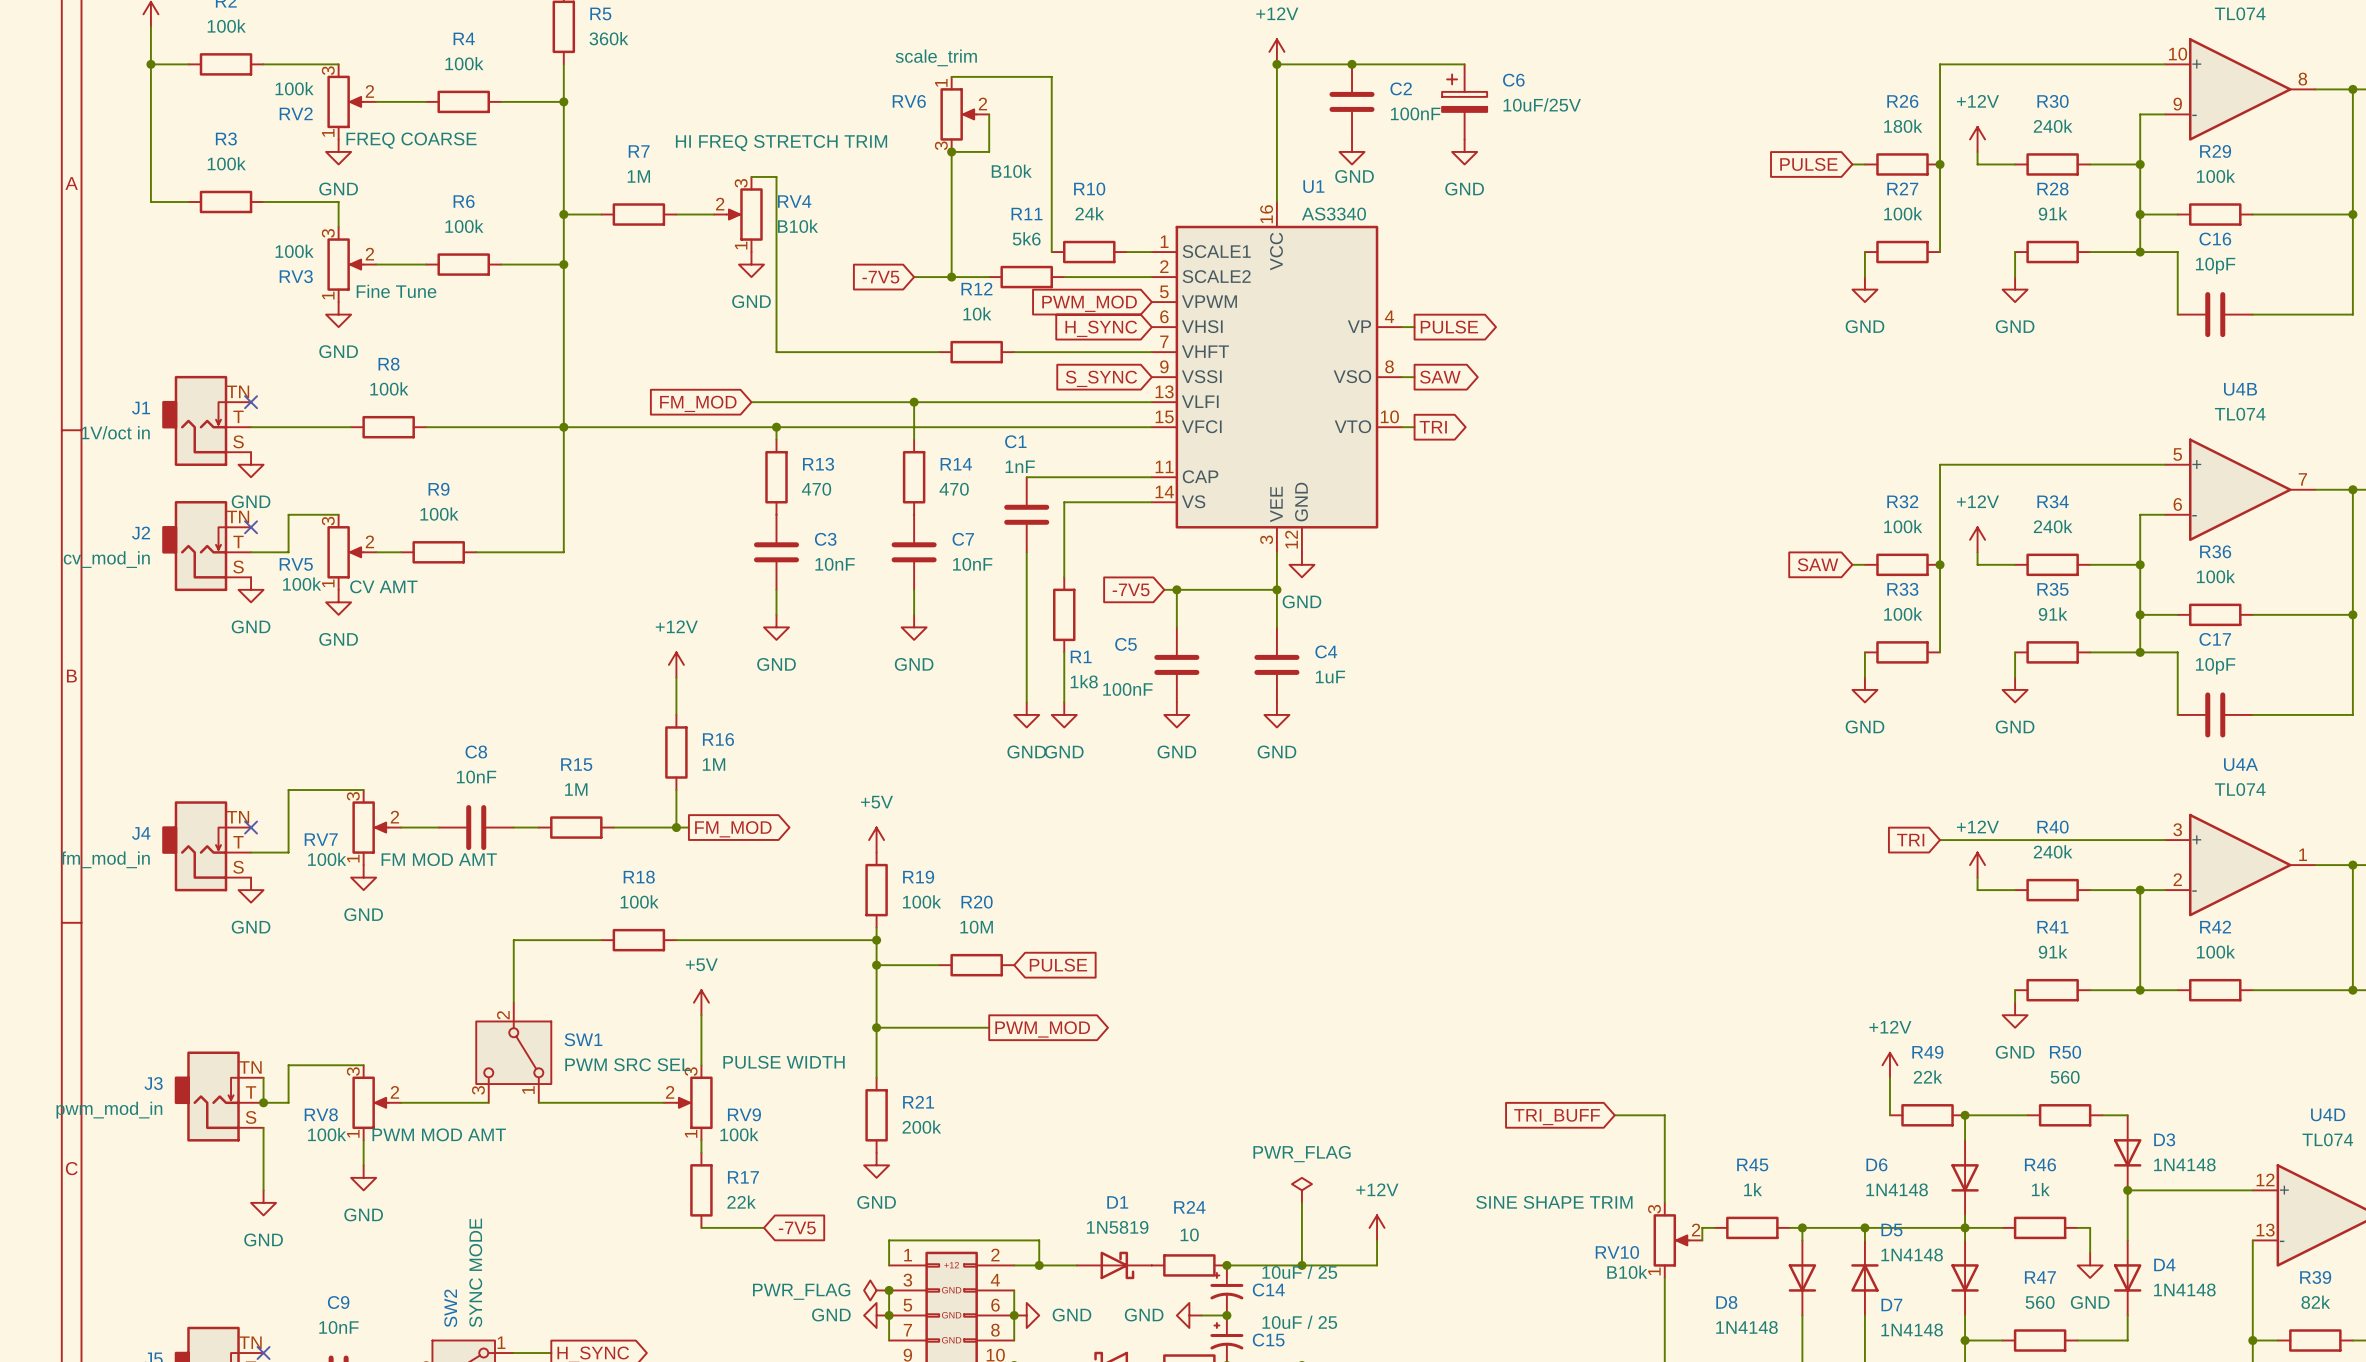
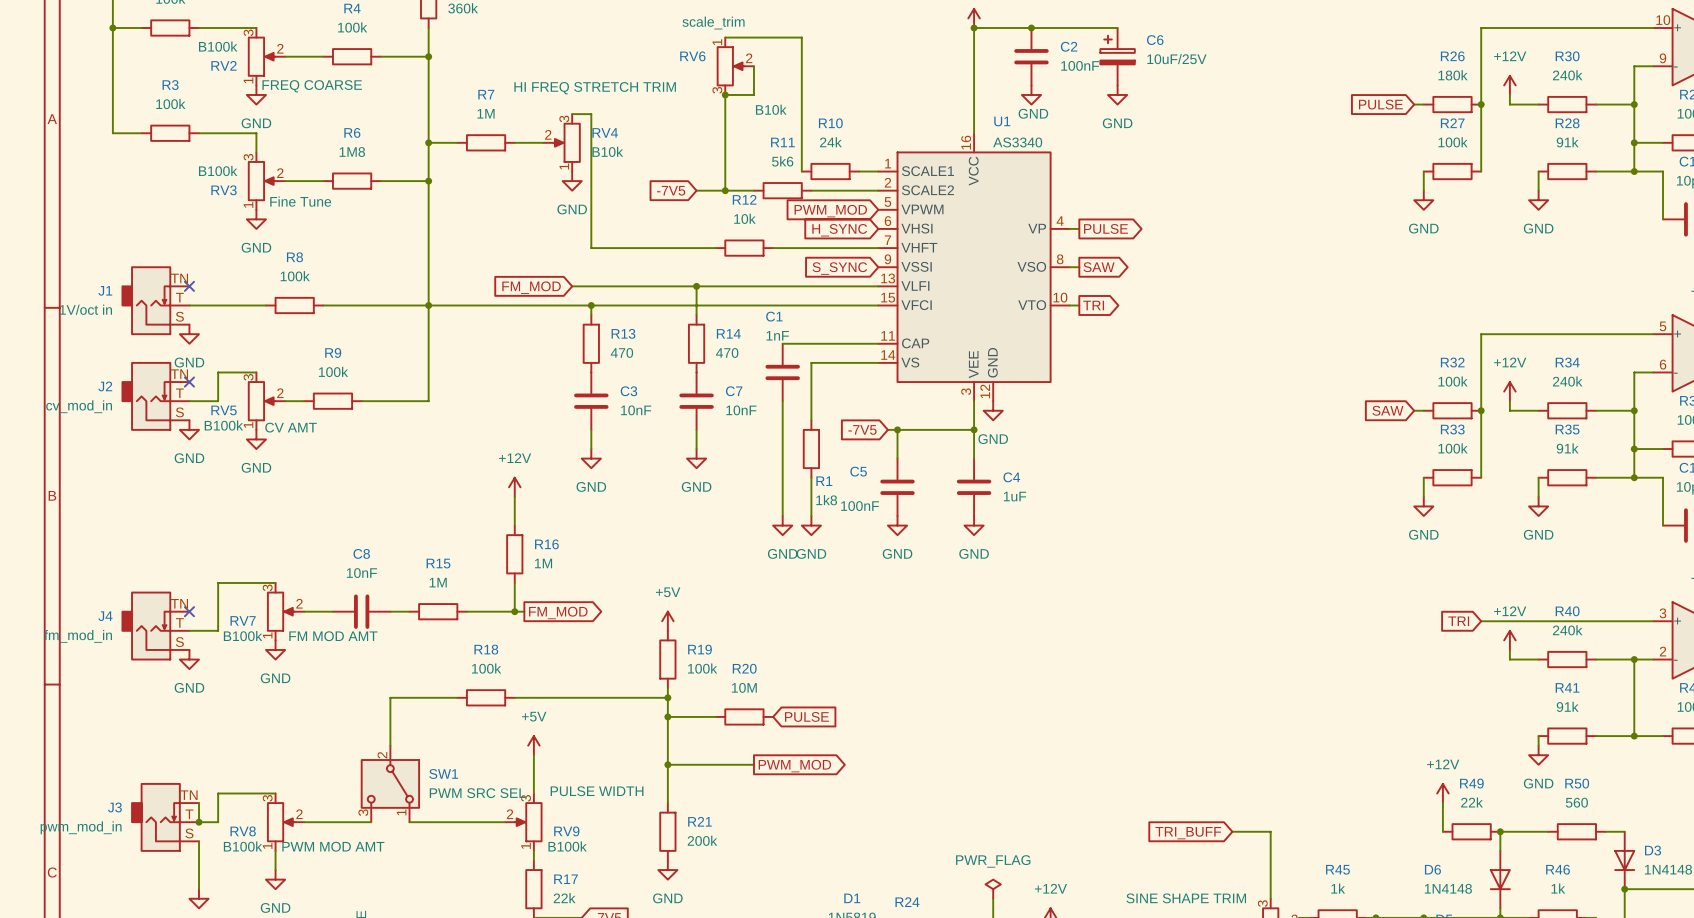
RV2 value: 100k (294, 88) -> B100k (218, 46)
R6 value: 100k (464, 226) -> 1M8 (352, 152)
RV3 value: 100k (294, 251) -> B100k (218, 170)
RV5 value: 100k (302, 584) -> B100k (223, 425)
RV7 value: 100k (327, 859) -> B100k (243, 636)
RV8 value: 100k (327, 1134) -> B100k (243, 846)
RV9 value: 100k (739, 1134) -> B100k (567, 846)

